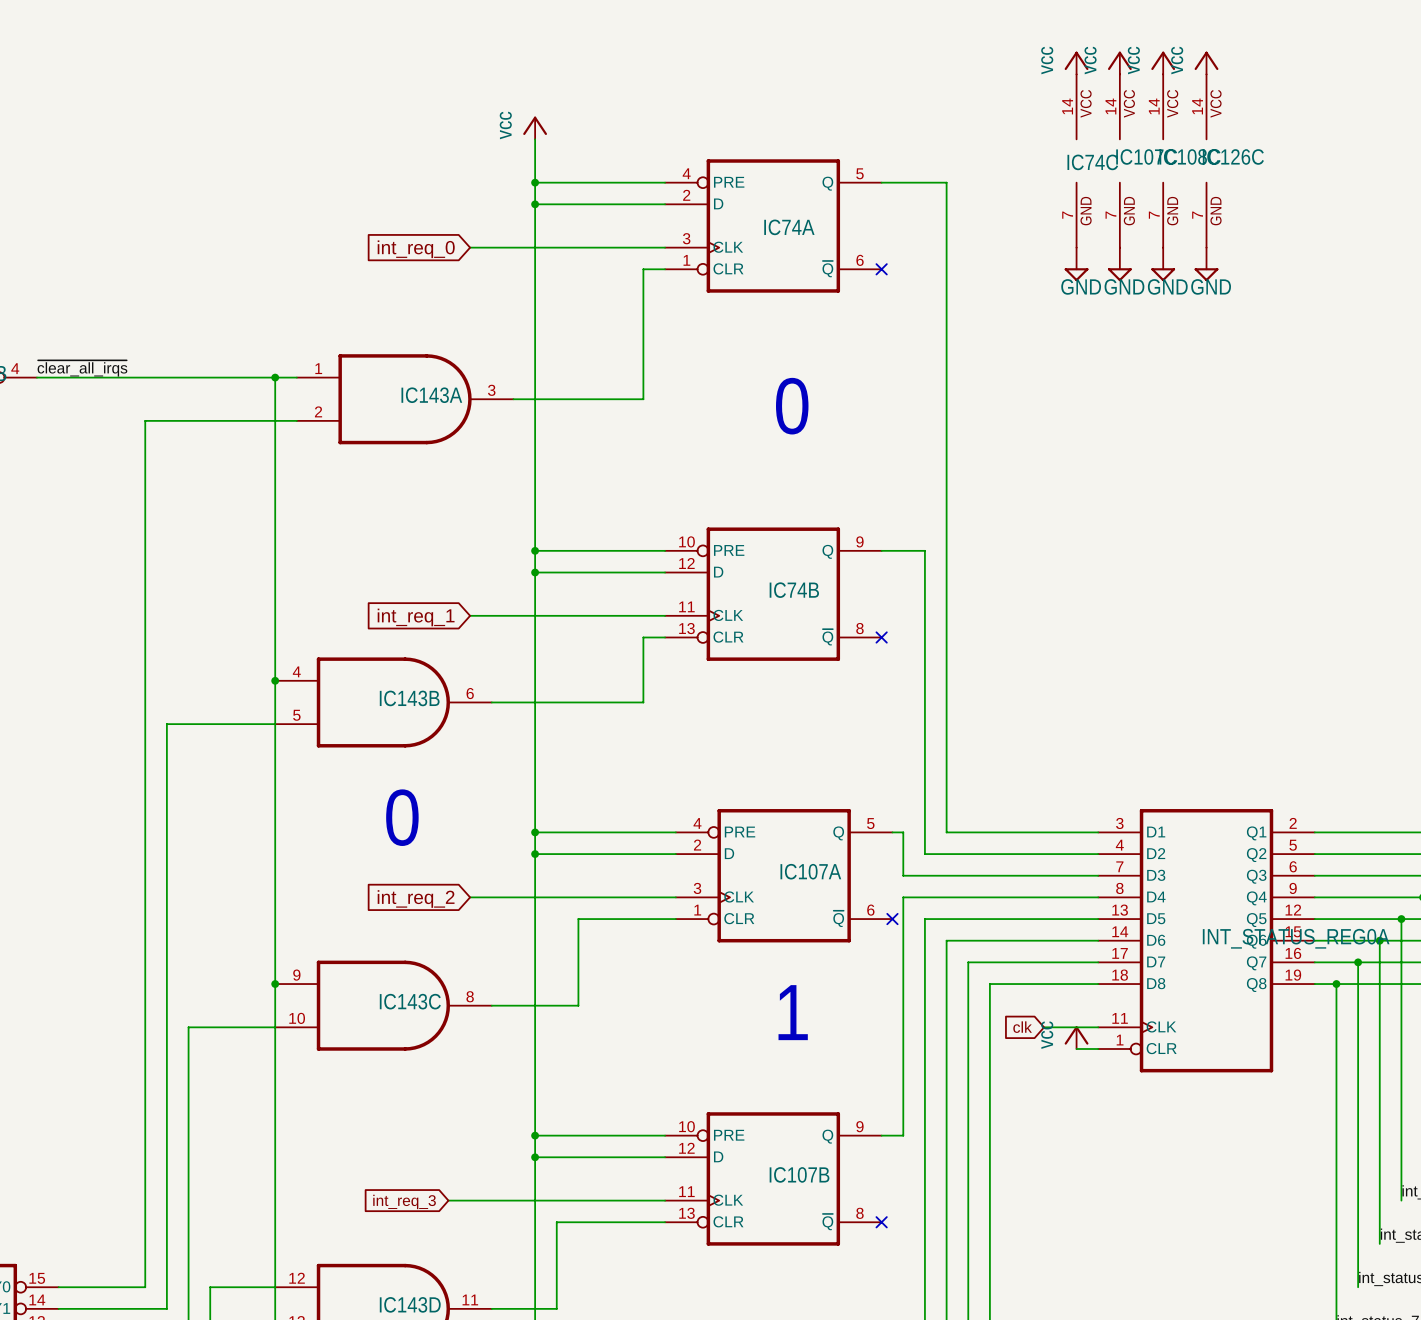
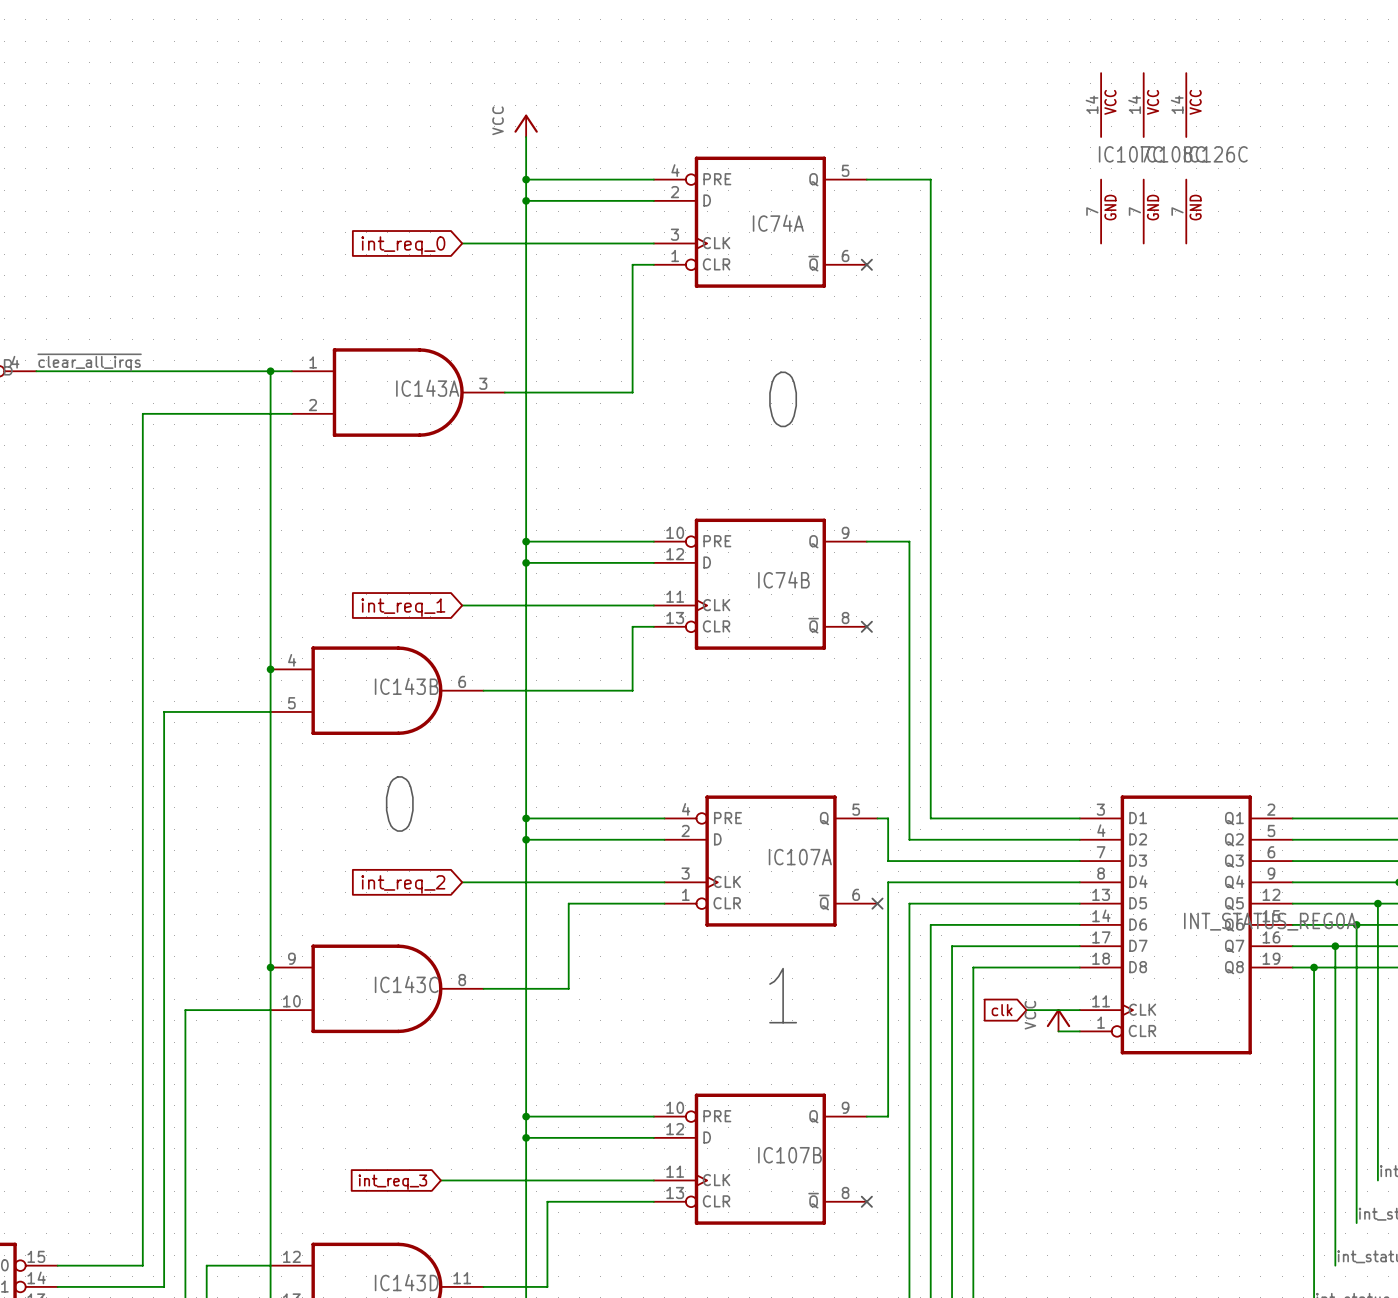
power symbol: vcc (1076, 63) -> none
power symbol: vcc (1119, 63) -> none
power symbol: vcc (1163, 63) -> none
power symbol: vcc (1206, 63) -> none
IC74C: (1076, 161) -> none
power symbol: GND (1076, 264) -> none
power symbol: GND (1119, 264) -> none
power symbol: GND (1163, 264) -> none
power symbol: GND (1206, 264) -> none

